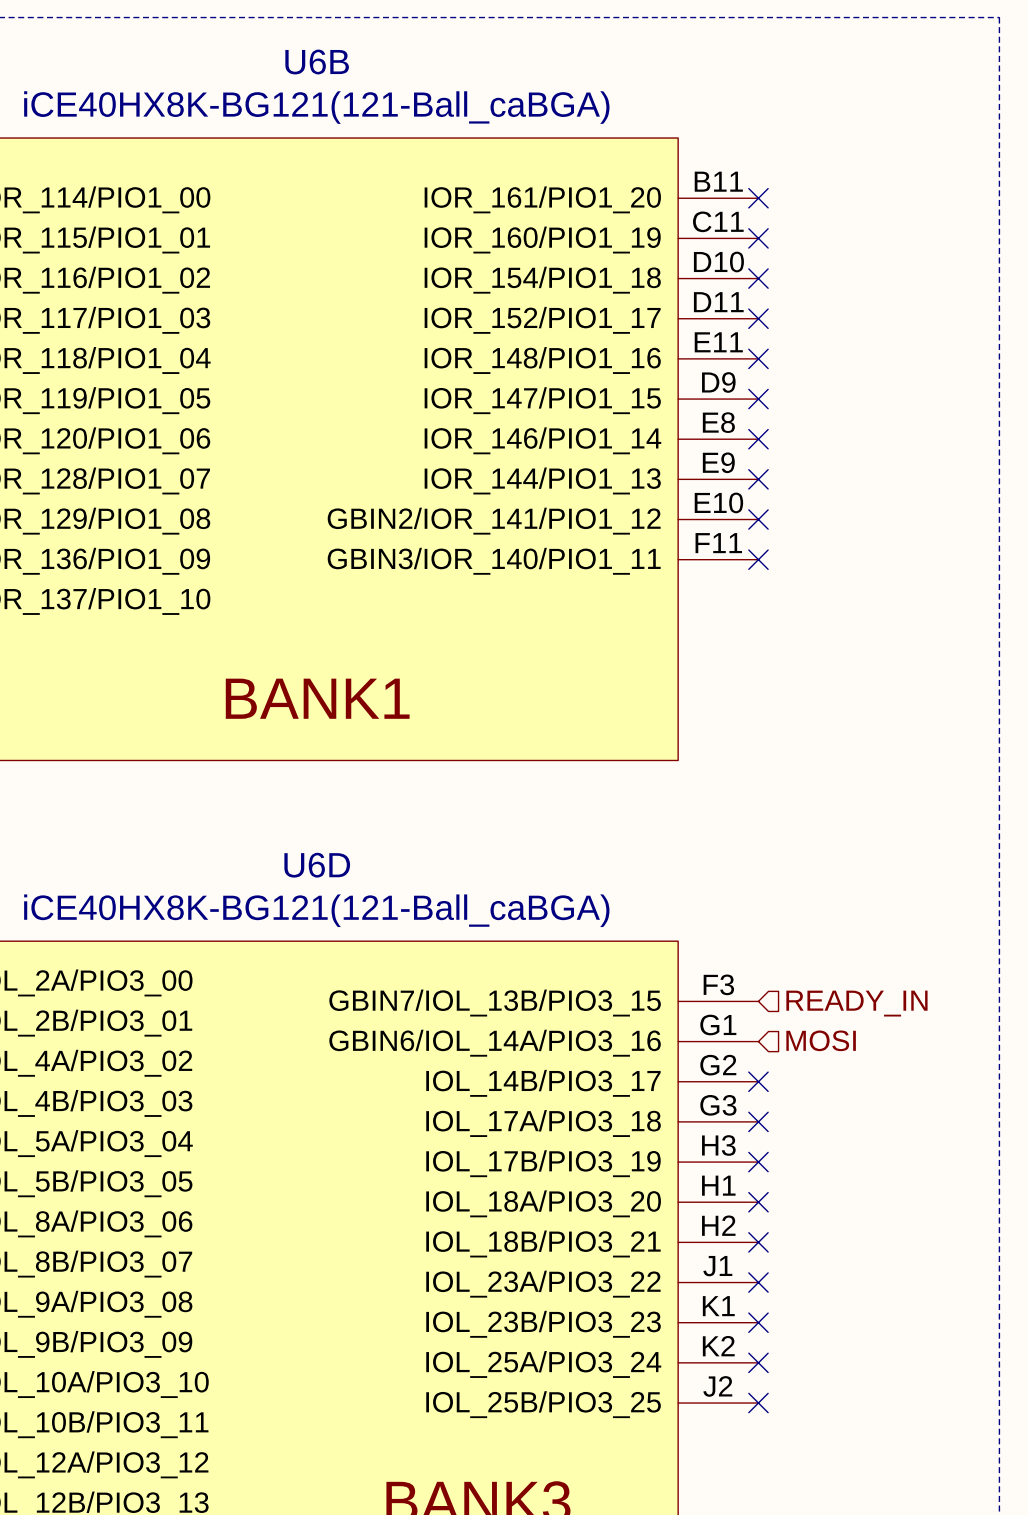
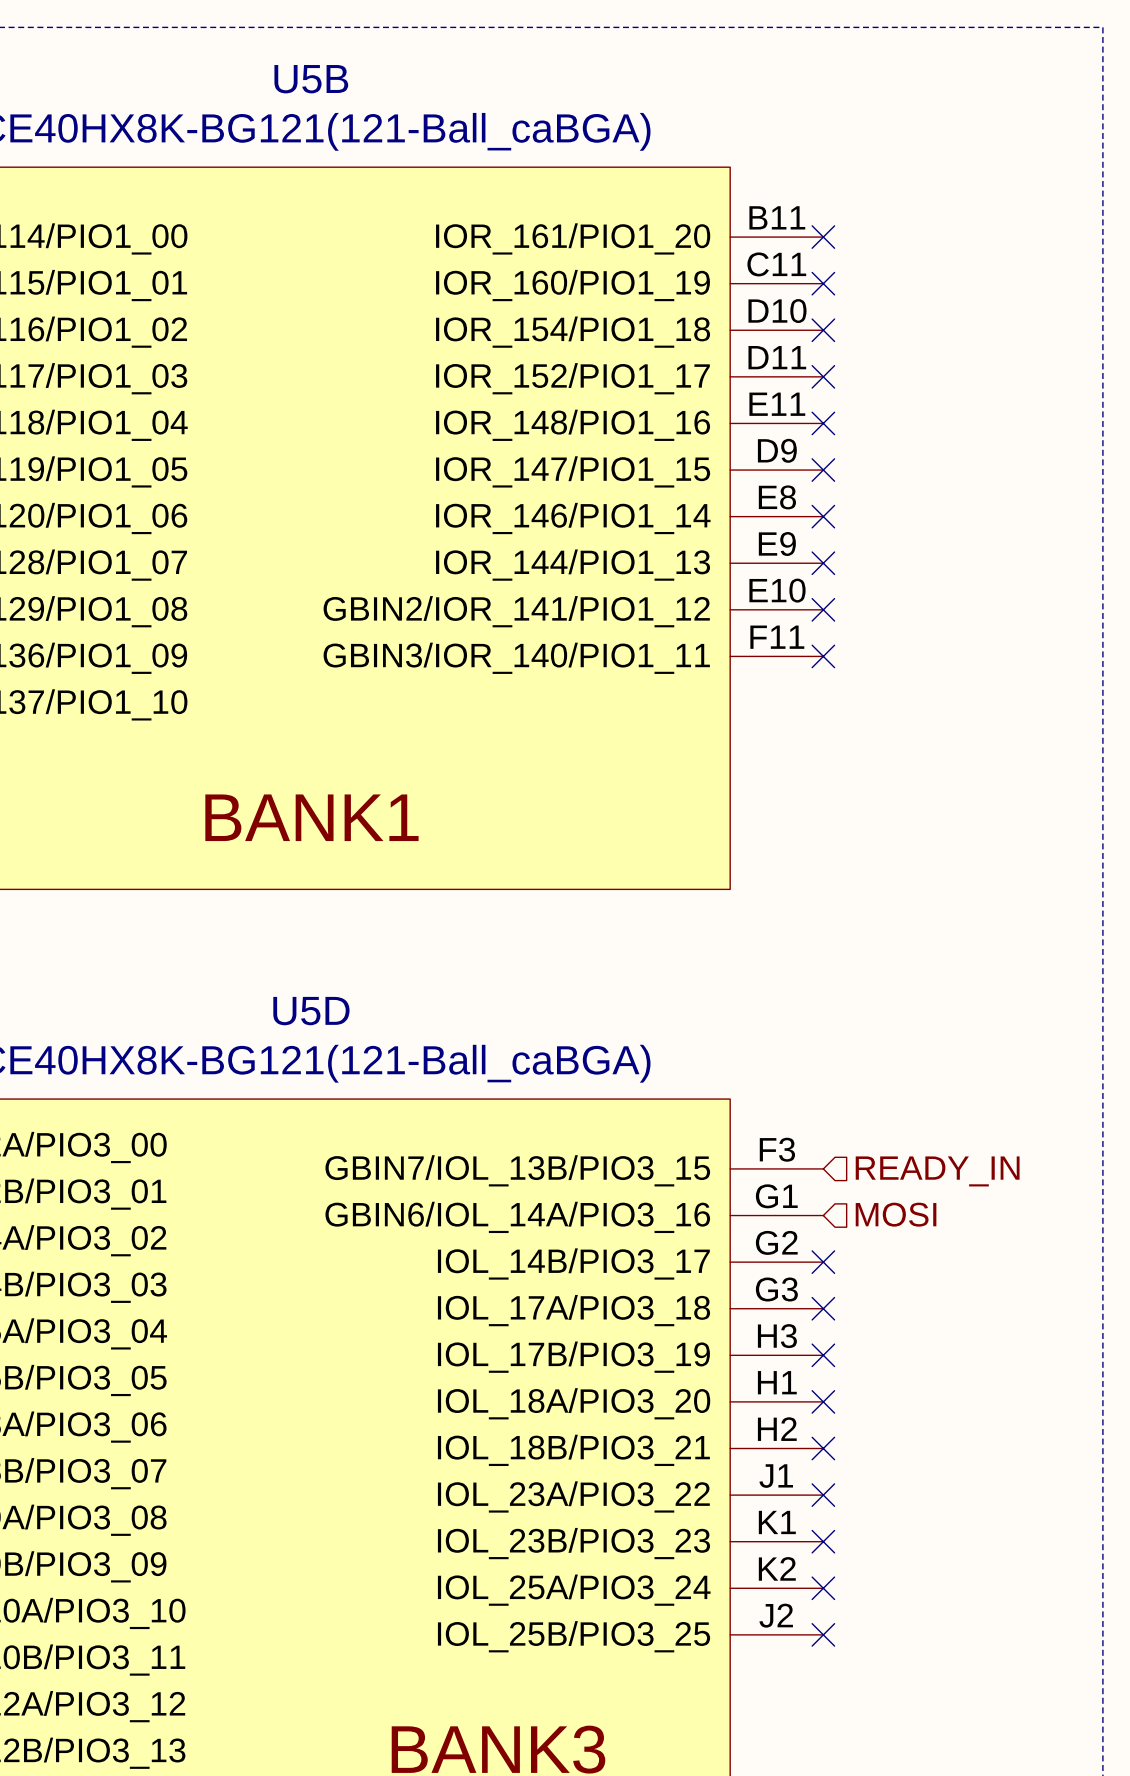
U6B name: U6B (317, 62) -> U5B (311, 79)
U6D name: U6D (317, 865) -> U5D (311, 1011)

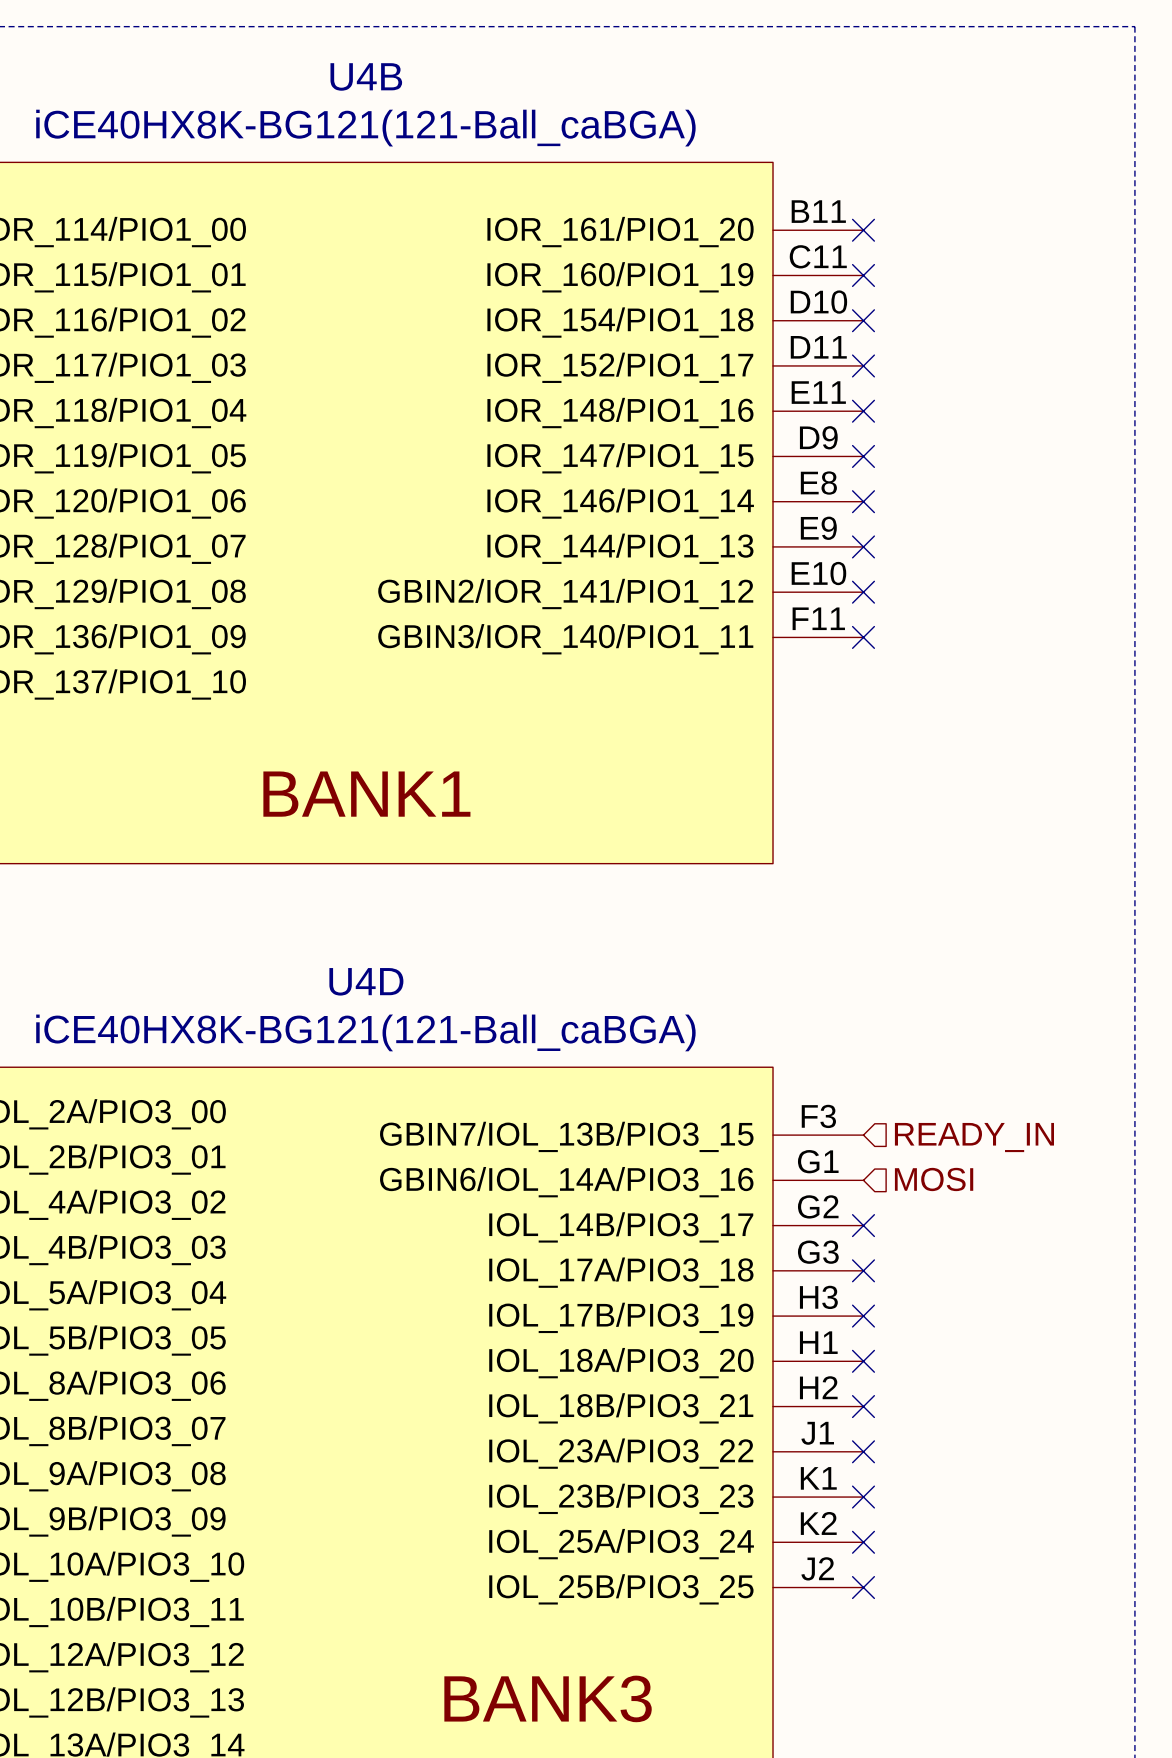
U5B name: U5B (311, 79) -> U4B (366, 76)
U5D name: U5D (311, 1011) -> U4D (366, 981)

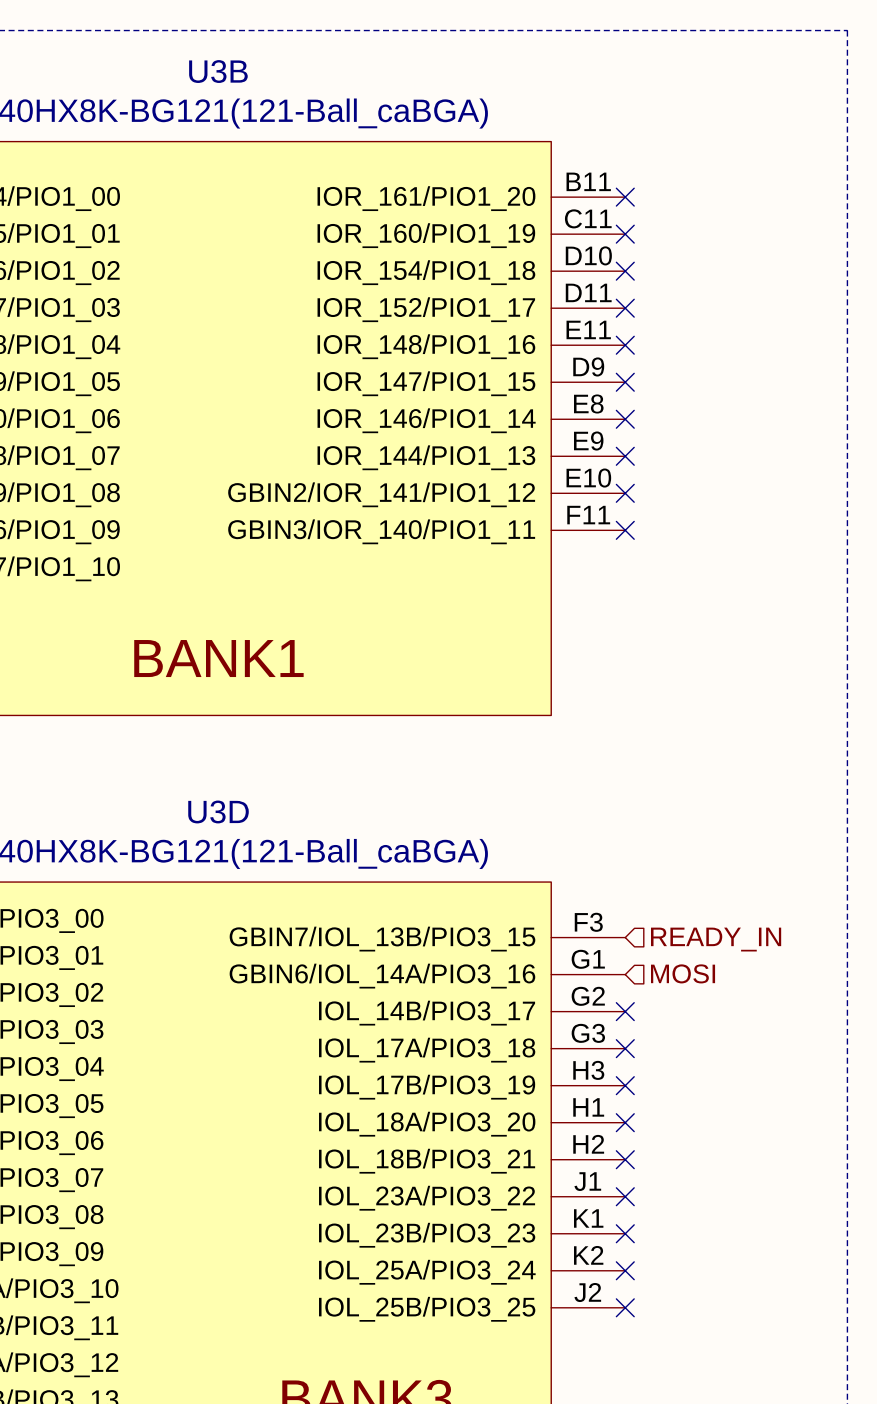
U4B name: U4B (366, 76) -> U3B (218, 71)
U4D name: U4D (366, 981) -> U3D (218, 811)

